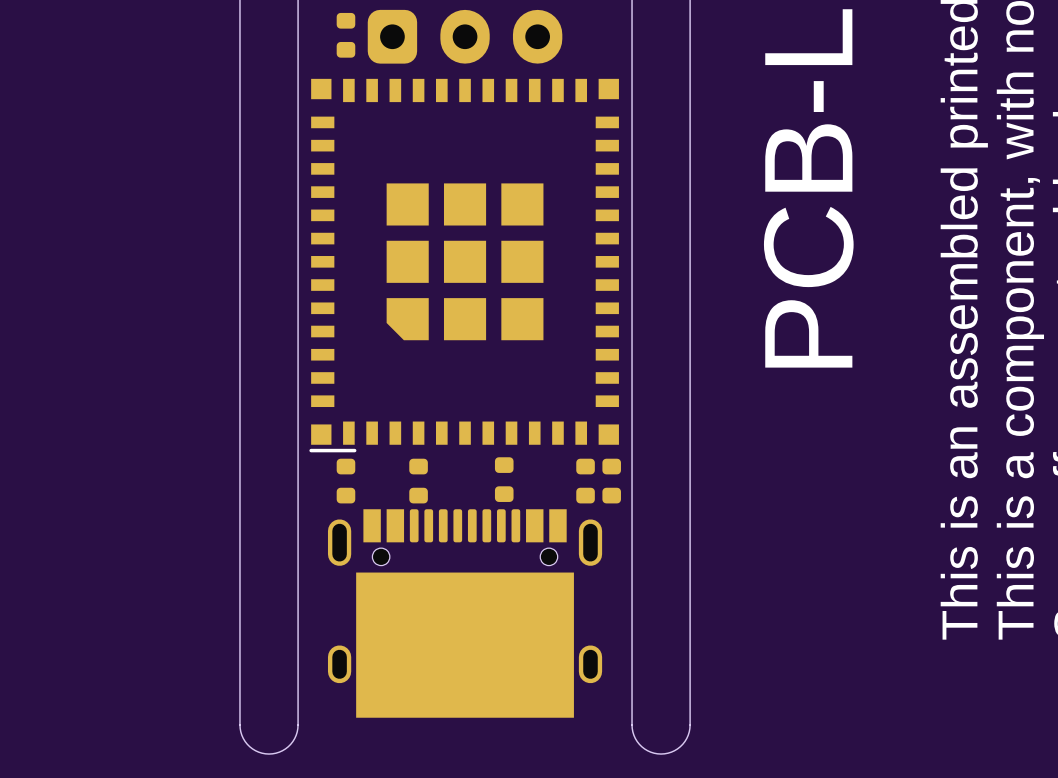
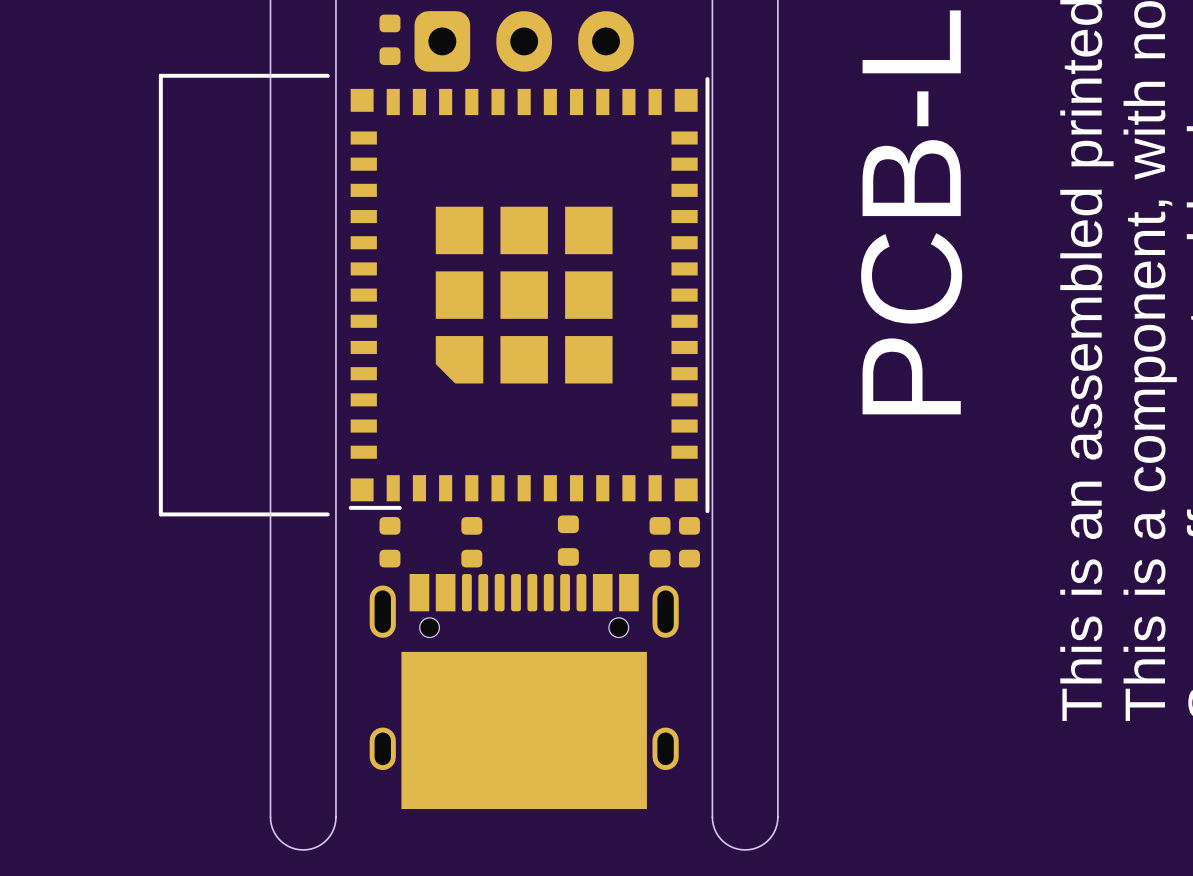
part: none -> (434, 295)
part footprint: [327, 509, 603, 718] -> [369, 574, 679, 810]

